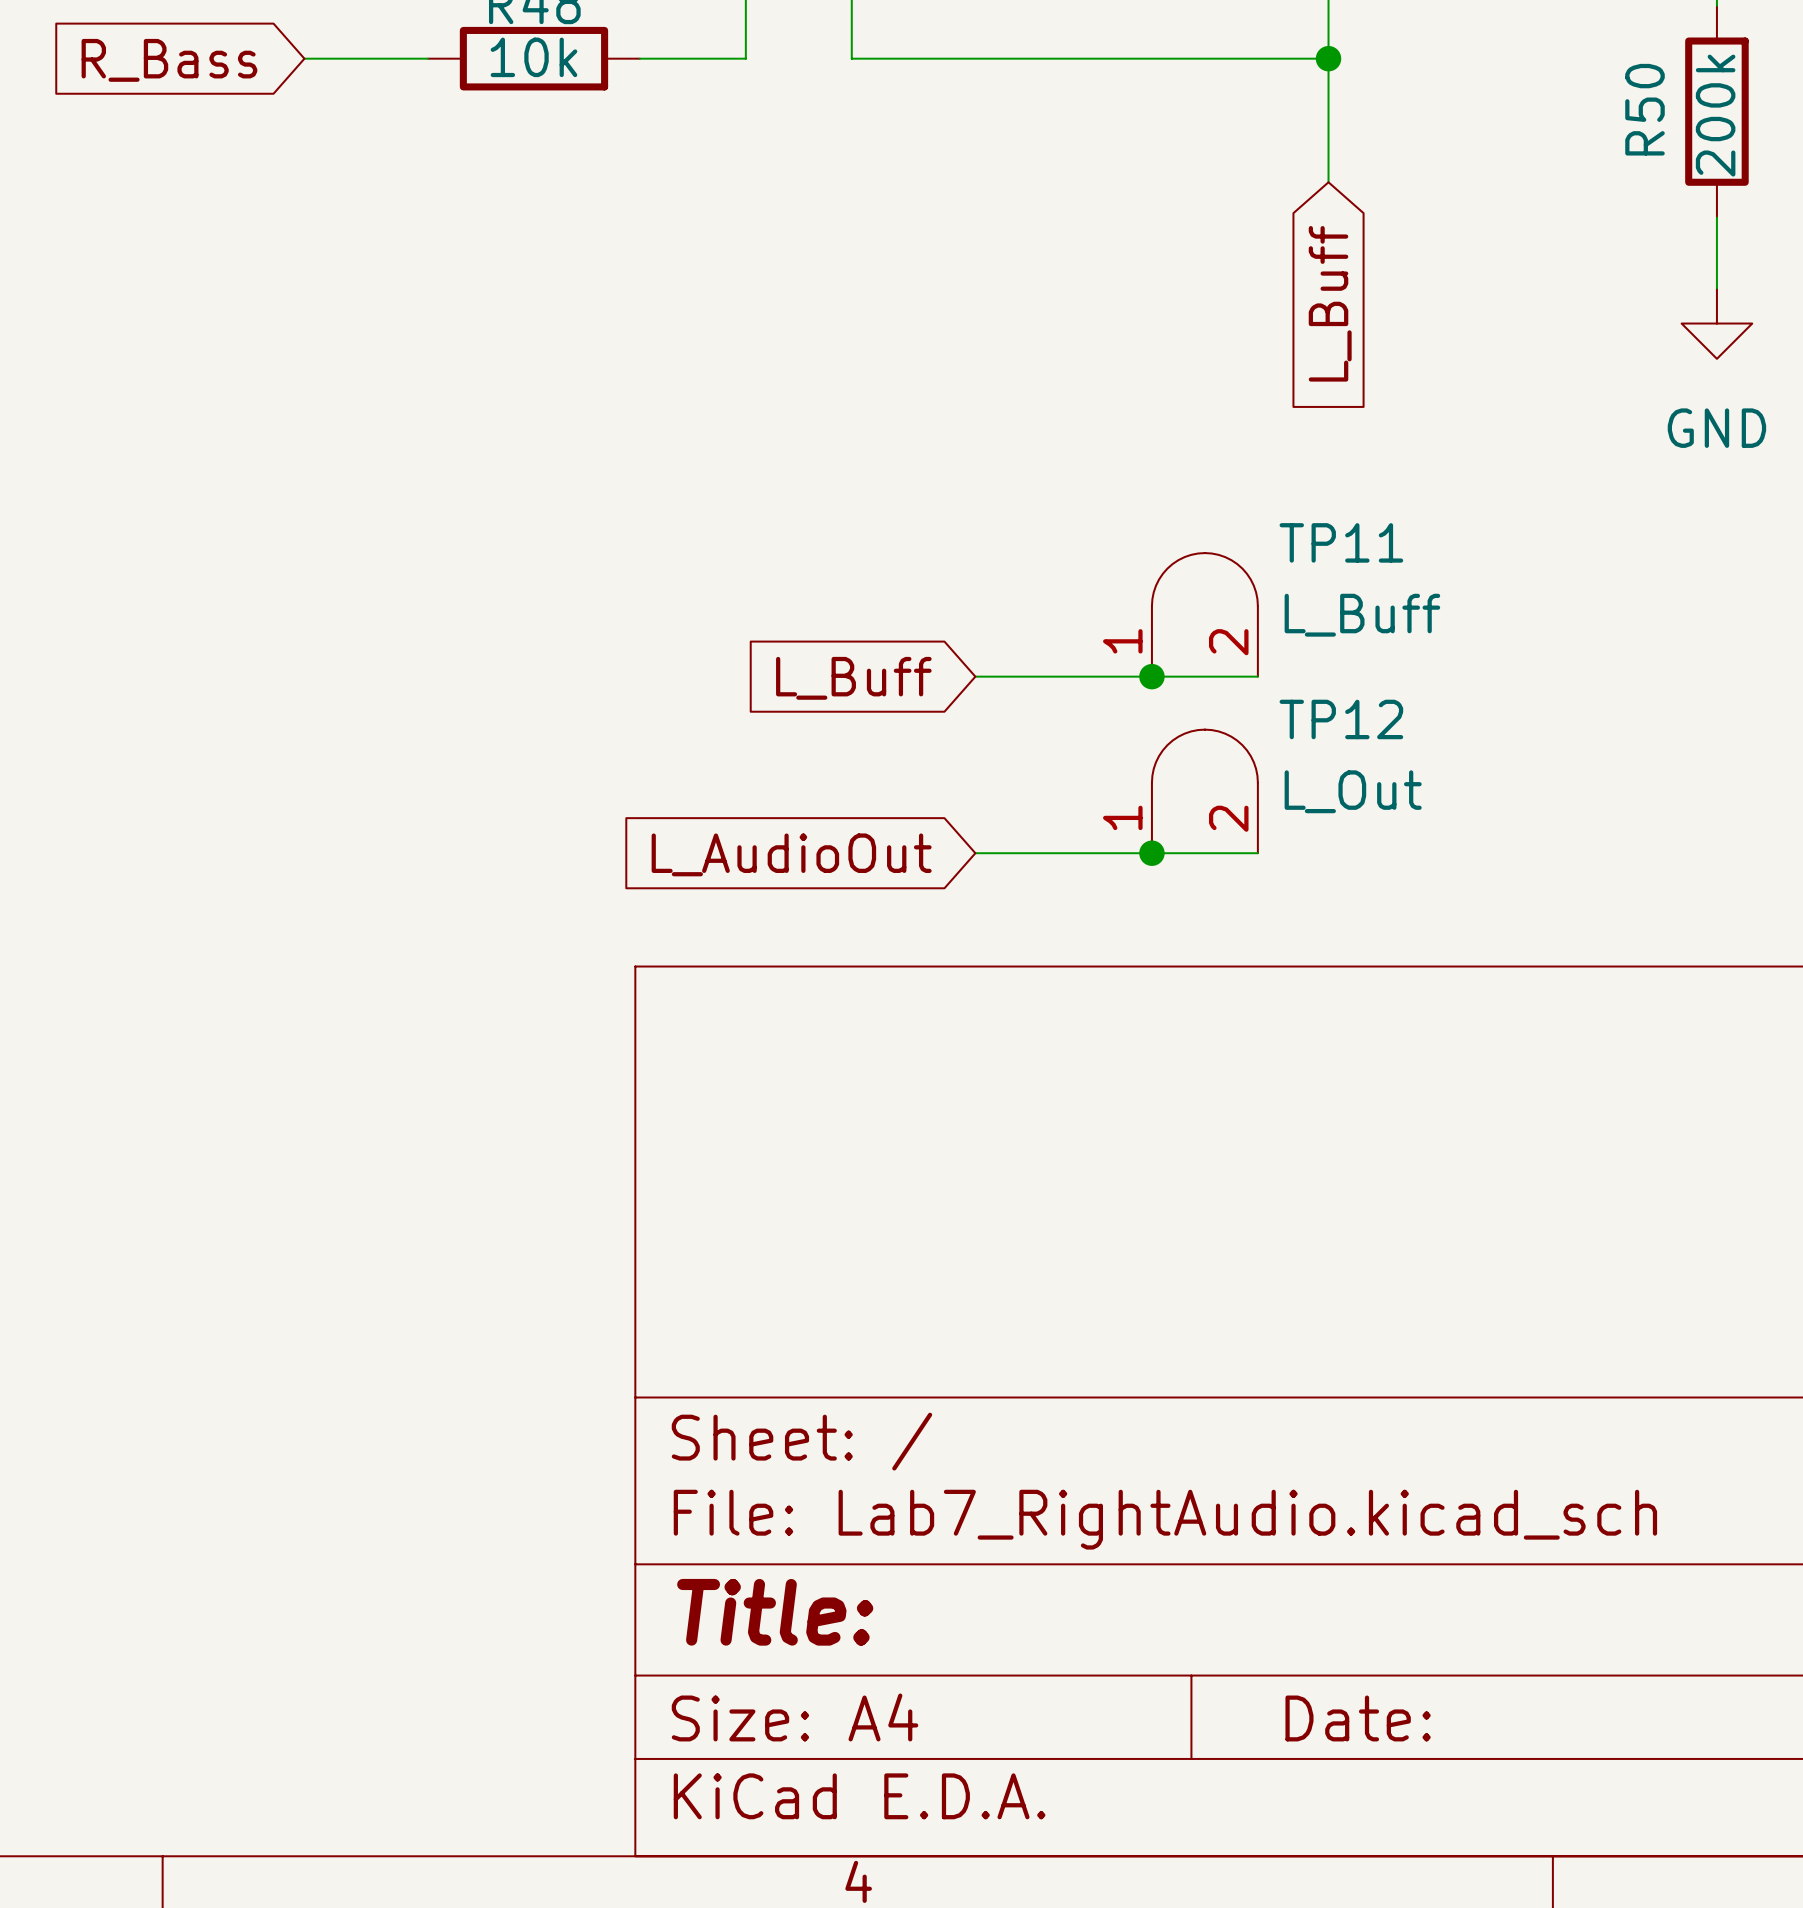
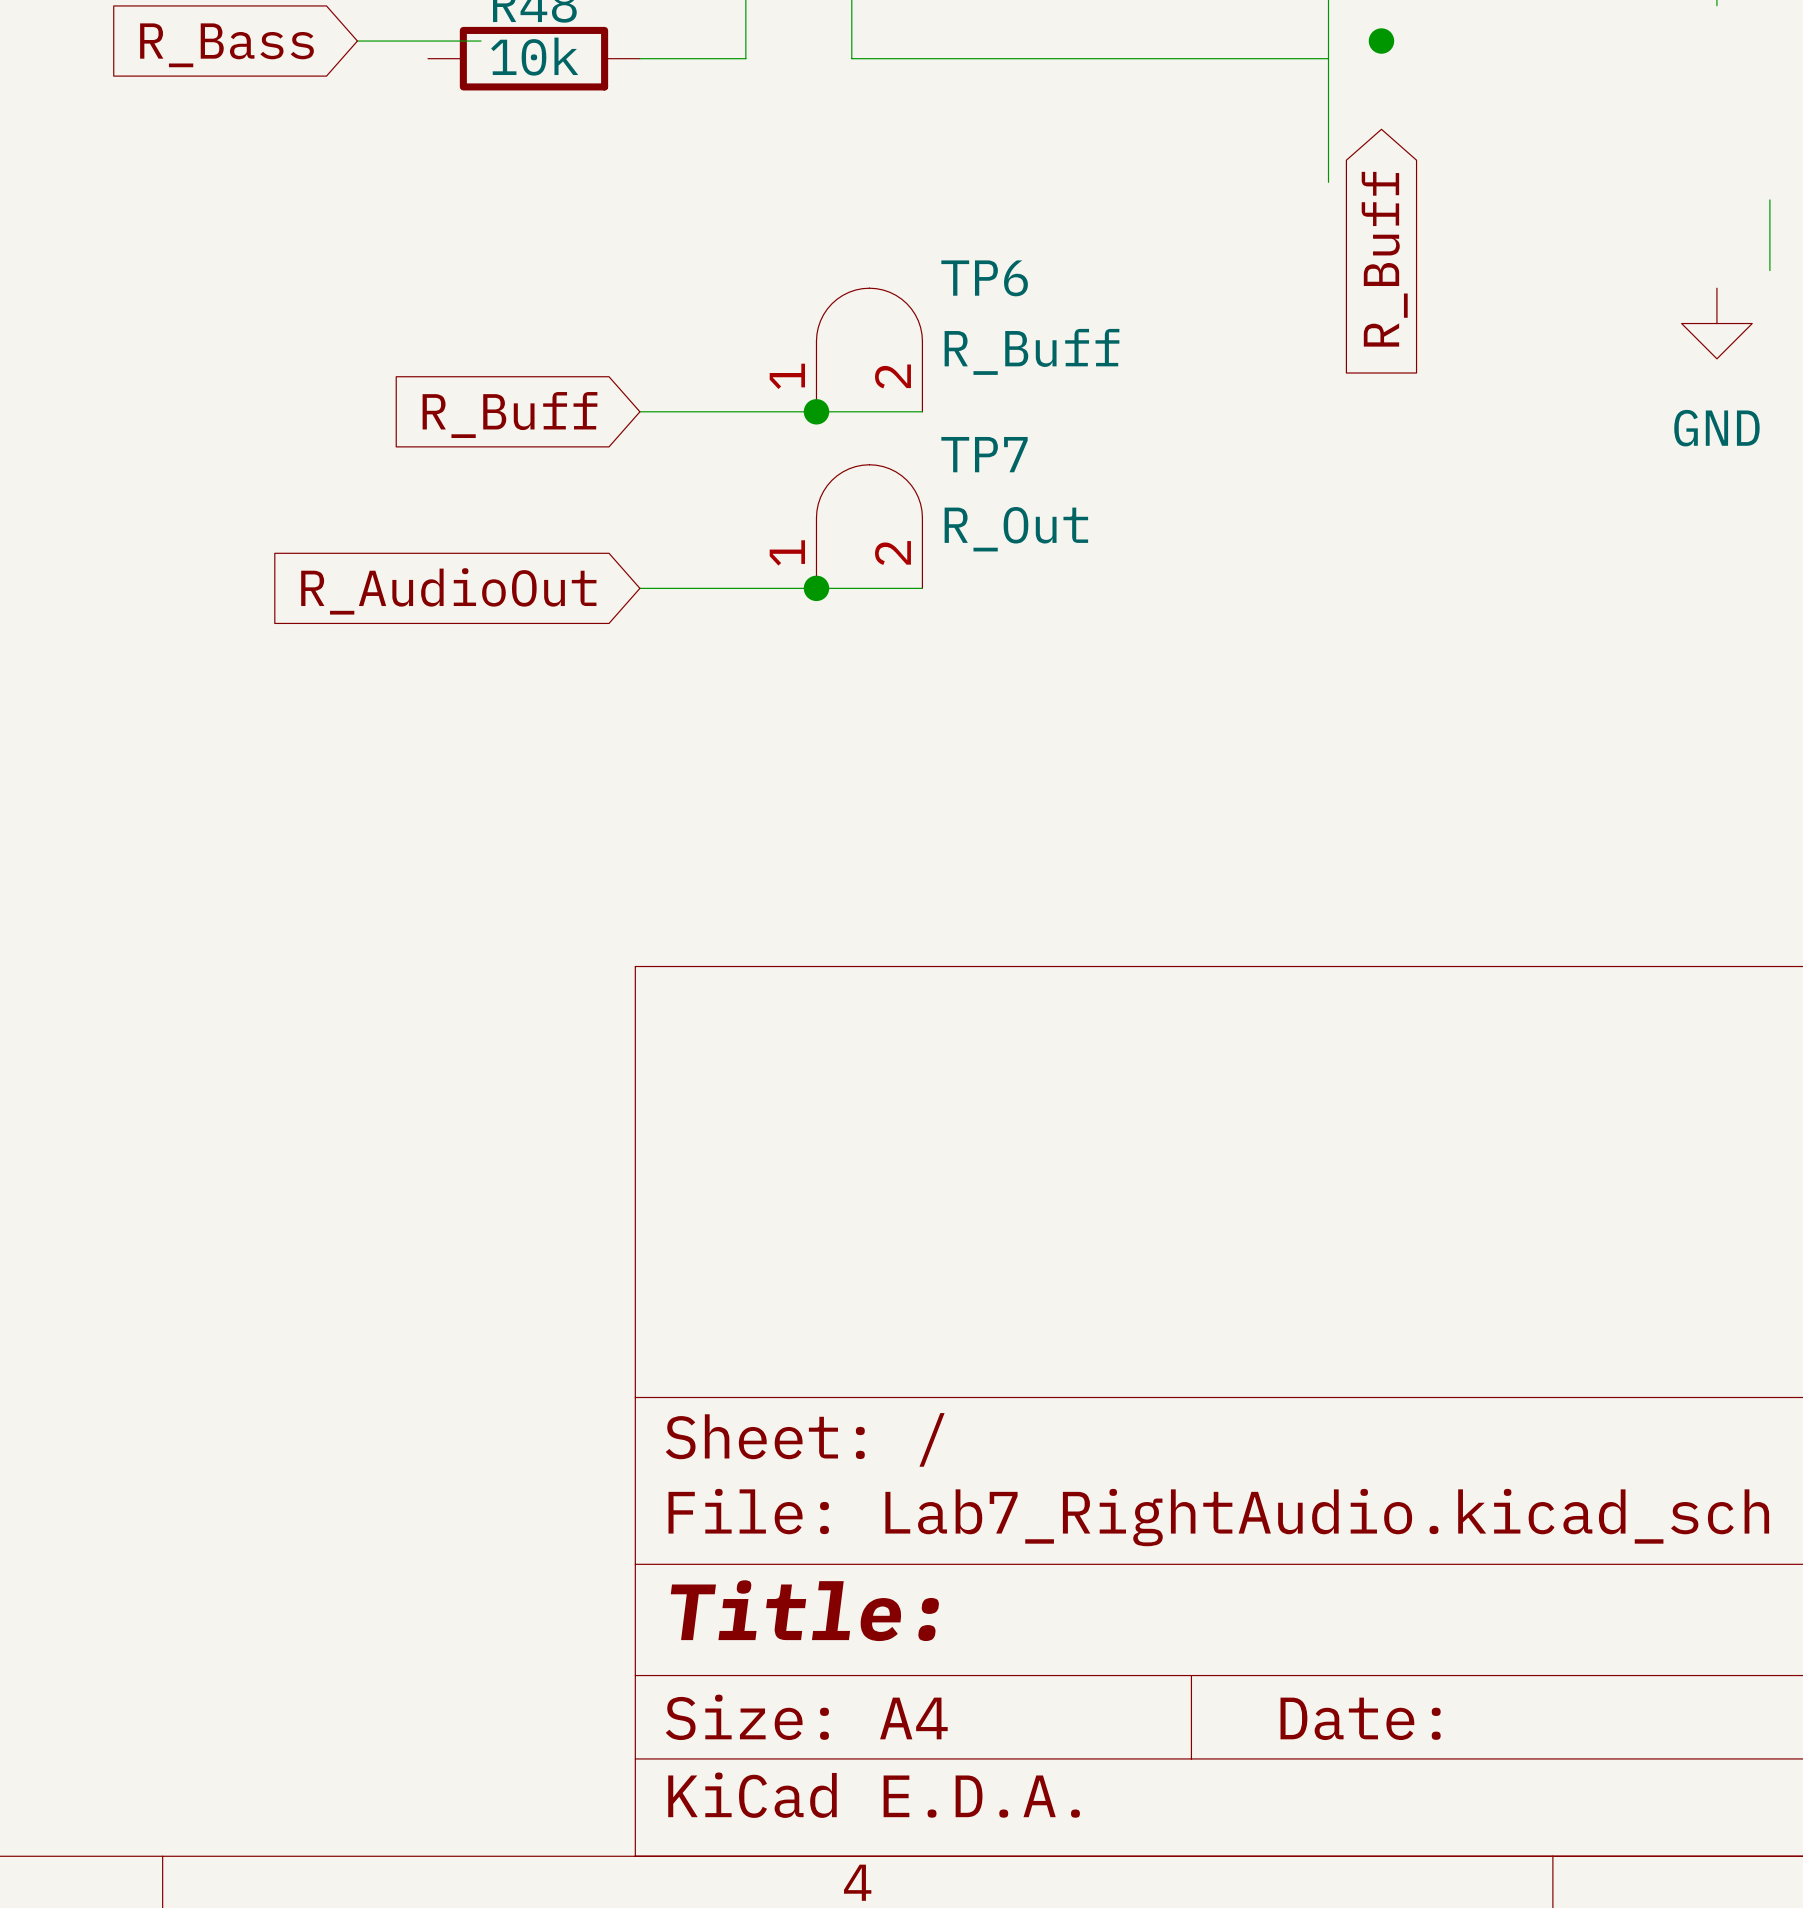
wire: (304, 58) (428, 58) -> (357, 41) (481, 41)
junction position: (1328, 58) -> (1381, 41)
global label position: R_Bass (169, 60) -> R_Bass (226, 45)
R50: 200k (1716, 111) -> none
wire: (1716, 217) (1716, 288) -> (1769, 199) (1769, 270)
global label: L_Buff (1330, 303) -> R_Buff (1384, 259)
TP6: none -> R_Buff (869, 350)
junction: none -> (816, 411)
global label: none -> R_Buff (509, 415)
TP7: none -> R_Out (869, 526)
junction: none -> (816, 588)
global label: none -> R_AudioOut (448, 591)
TP11: L_Buff (1204, 614) -> none
wire: (975, 676) (1257, 676) -> (639, 411) (922, 411)
junction: (1151, 676) -> none
global label: L_Buff (853, 678) -> none
TP12: L_Out (1204, 791) -> none
wire: (975, 853) (1257, 853) -> (639, 588) (922, 588)
junction: (1151, 853) -> none
global label: L_AudioOut (791, 854) -> none

